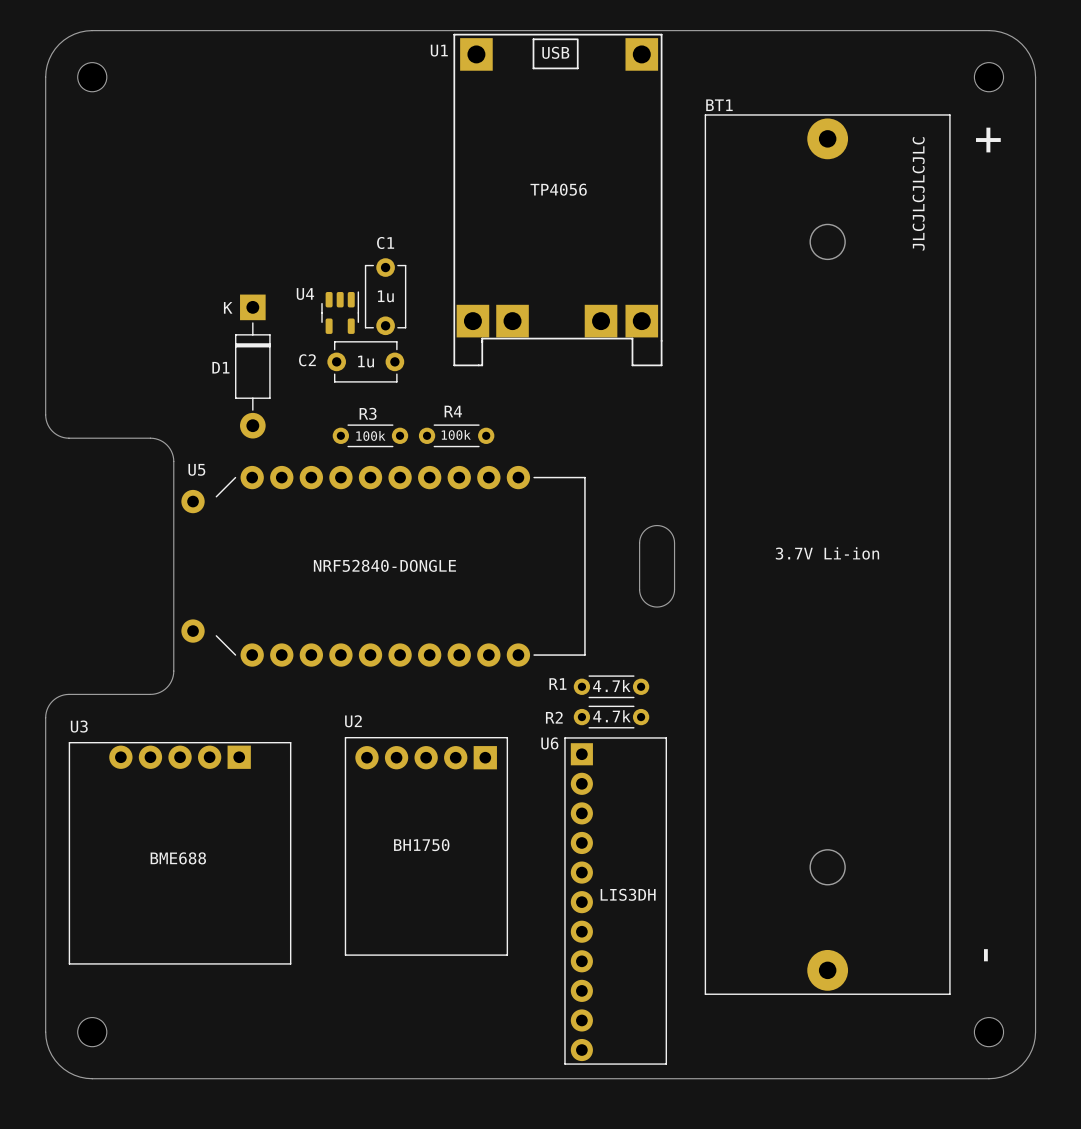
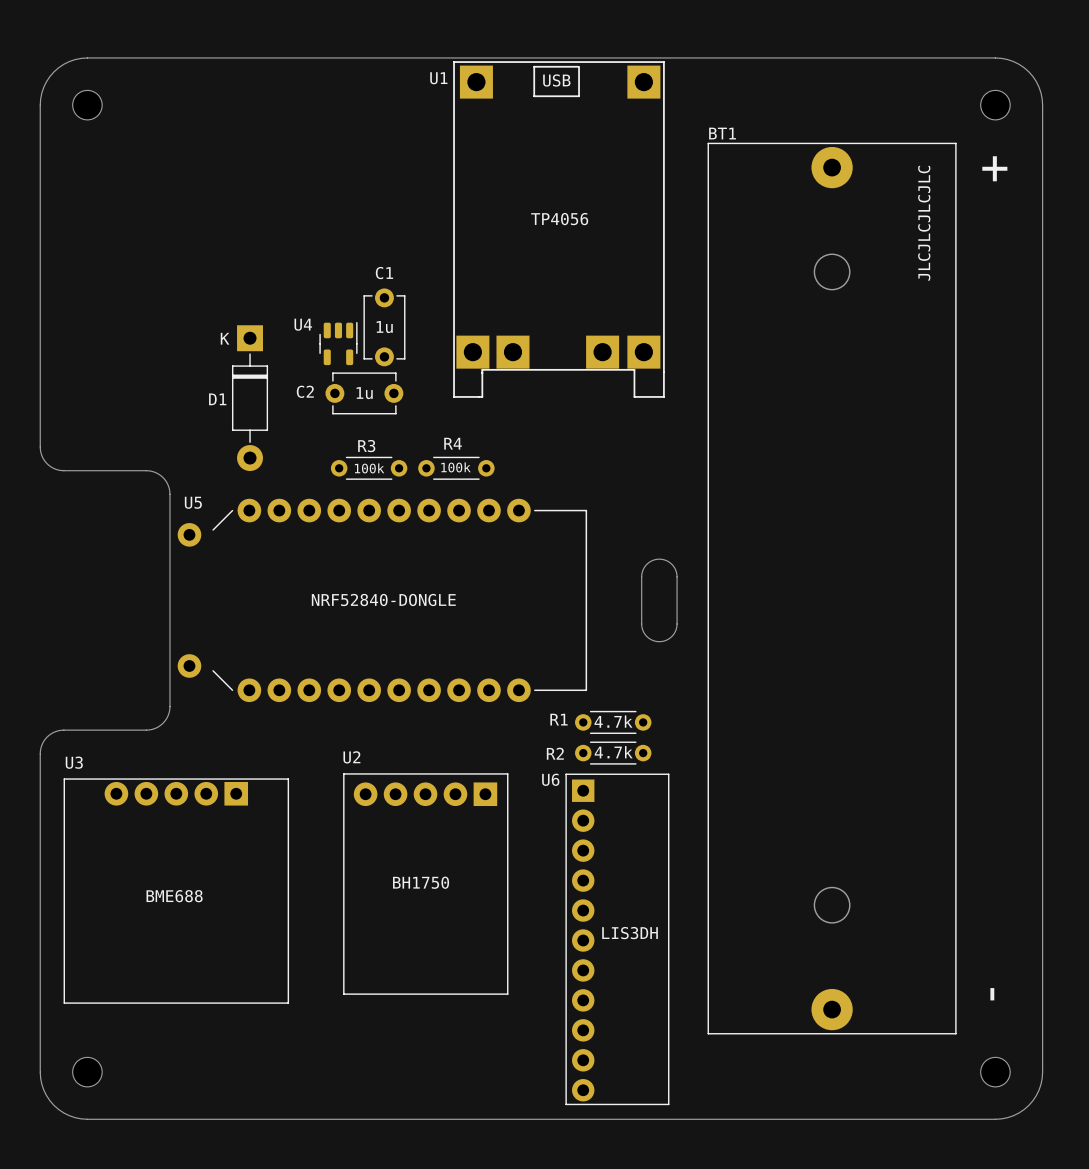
BT1 value: 3.7V Li-ion (827, 553) -> none

